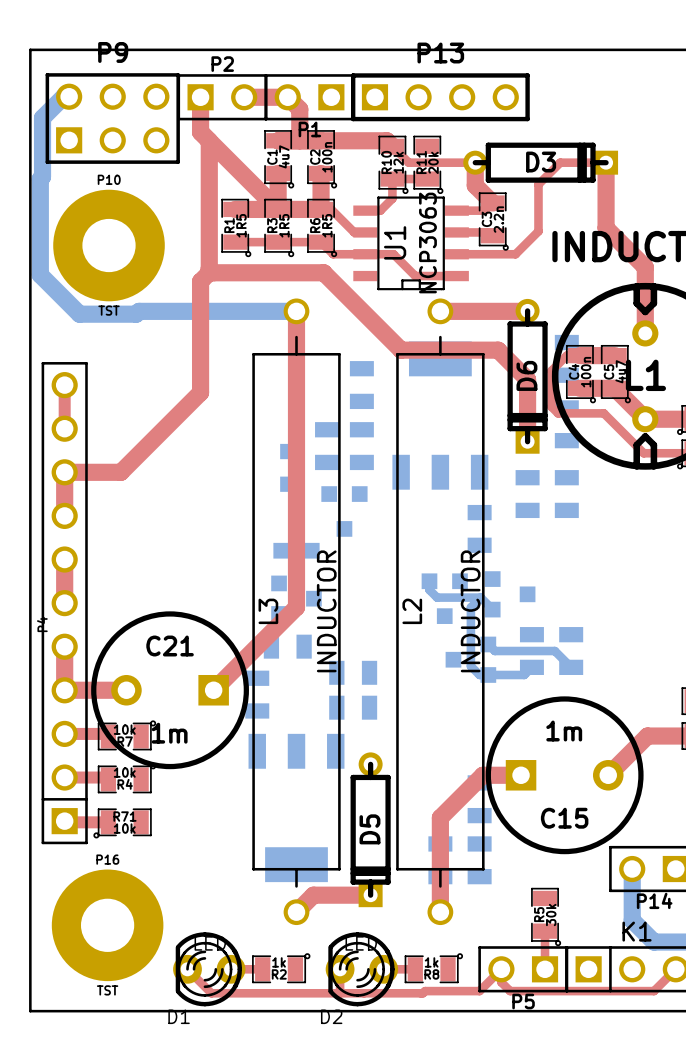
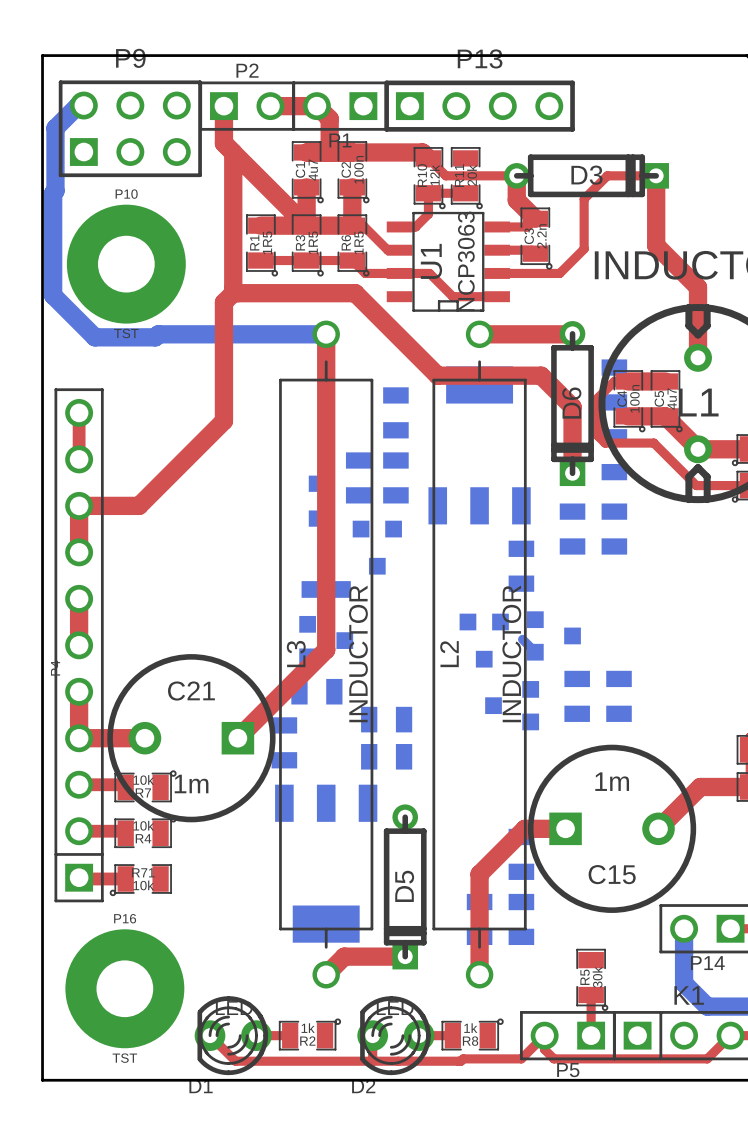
bottom track: (429, 581) (429, 589) (437, 597) (480, 597) (470, 607) (470, 666) (479, 674) (524, 674) (531, 667) -> none
bottom track: (488, 644) (494, 651) (554, 651) (571, 667) -> none

